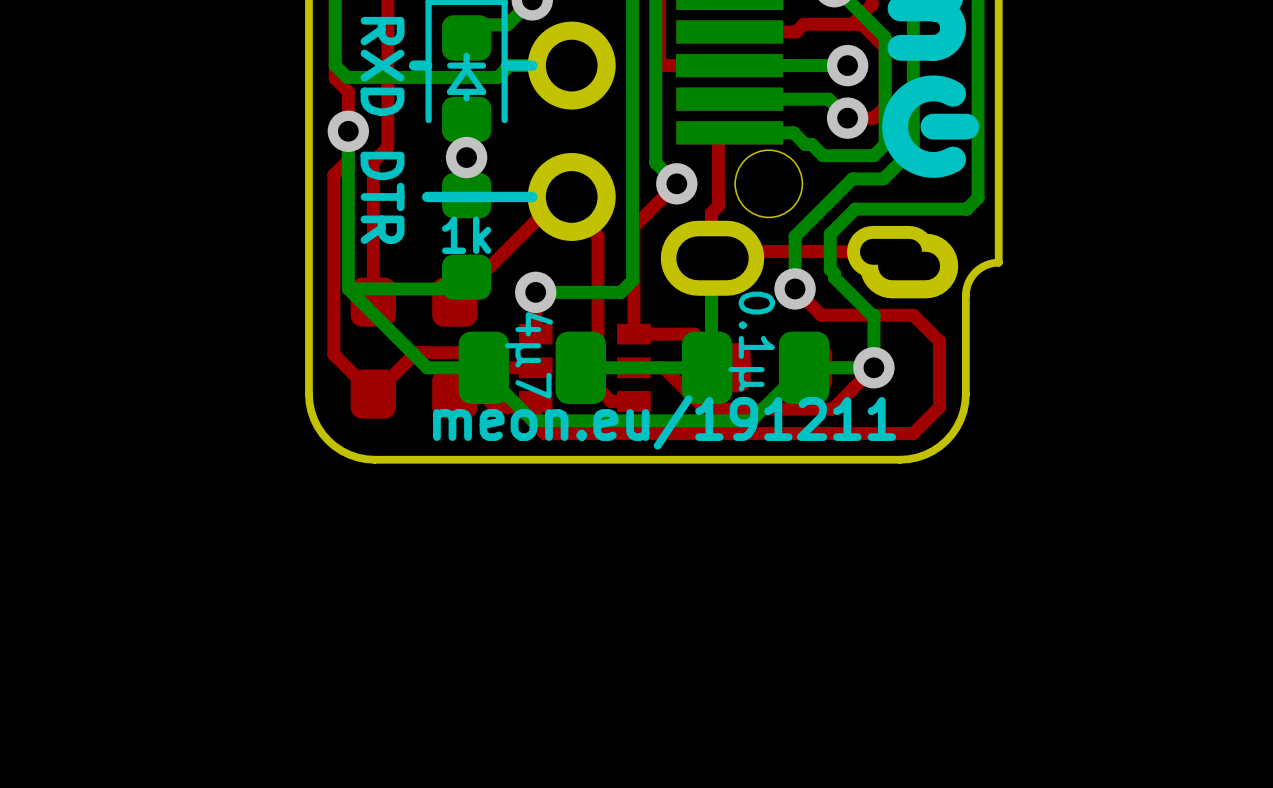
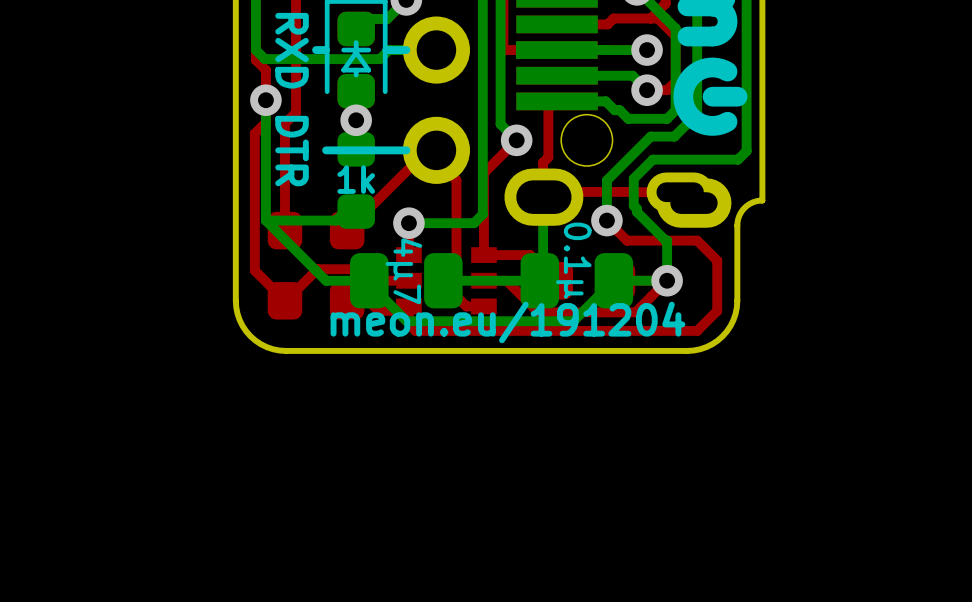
text: meon.eu/191211 (664, 422) -> meon.eu/191204 (507, 322)

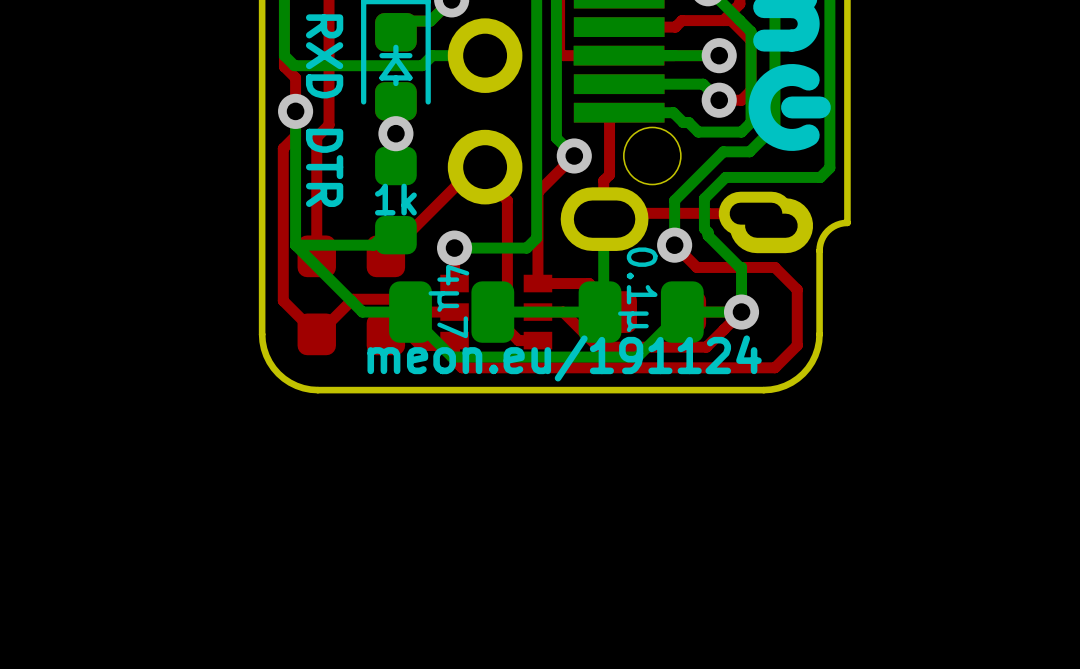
line: (326, 50) (316, 50) -> none
line: (406, 50) (386, 50) -> none
line: (406, 150) (326, 150) -> none
text: meon.eu/191204 (507, 322) -> meon.eu/191124 (564, 358)

